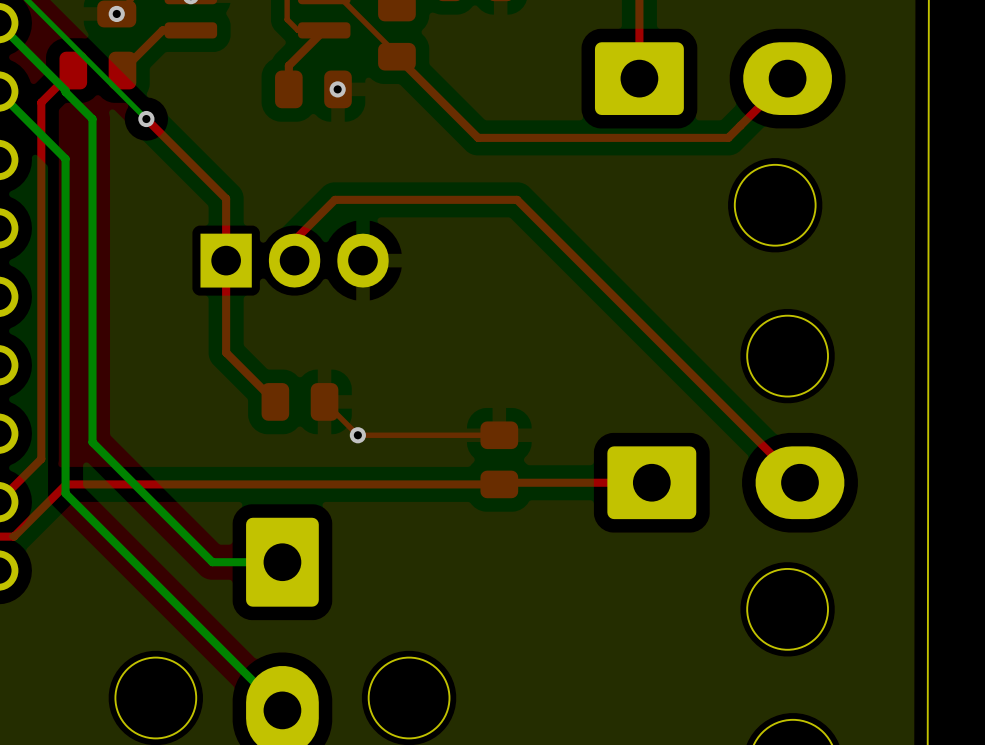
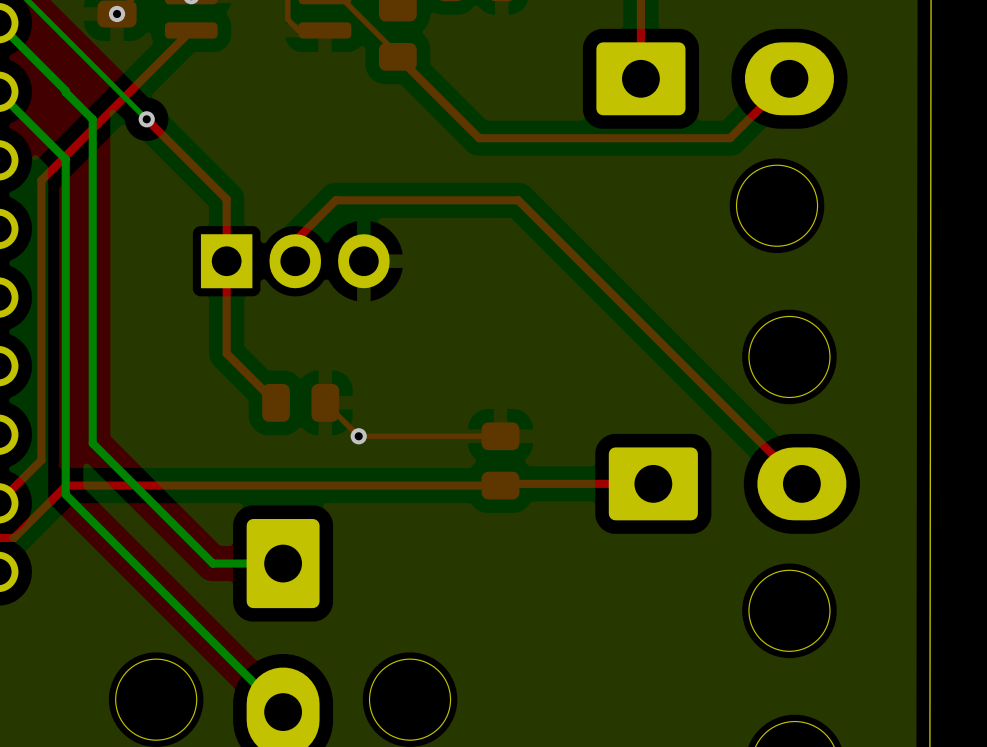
top track: (190, 30) (162, 30) (122, 70) -> none
top track: (324, 30) (288, 65) (288, 89) -> none
top track: (73, 70) (41, 102) (41, 179) -> (191, 30) (41, 180)
part: (97, 70) -> none
part: (313, 89) -> none
via: (337, 89) -> none

